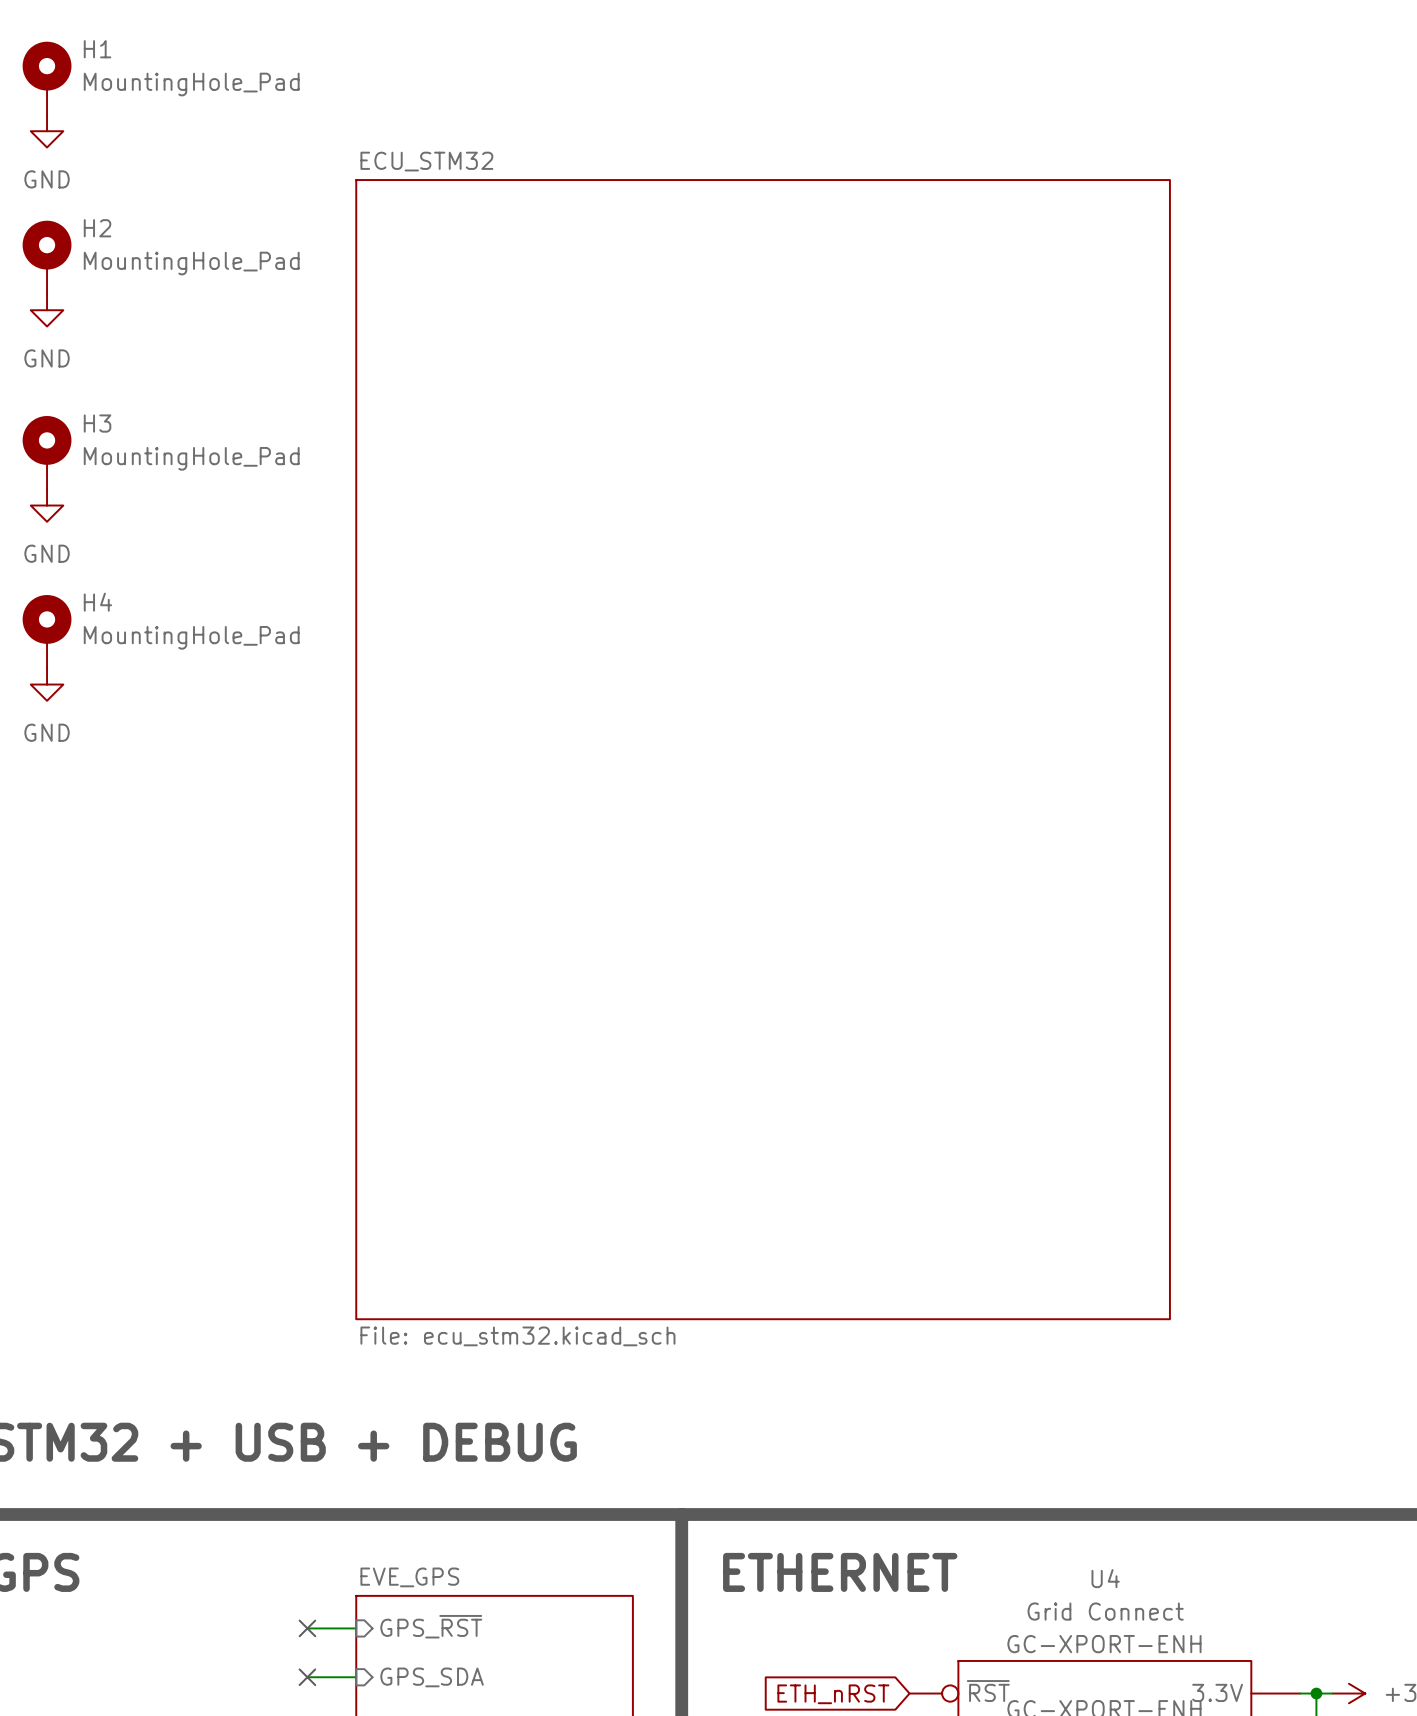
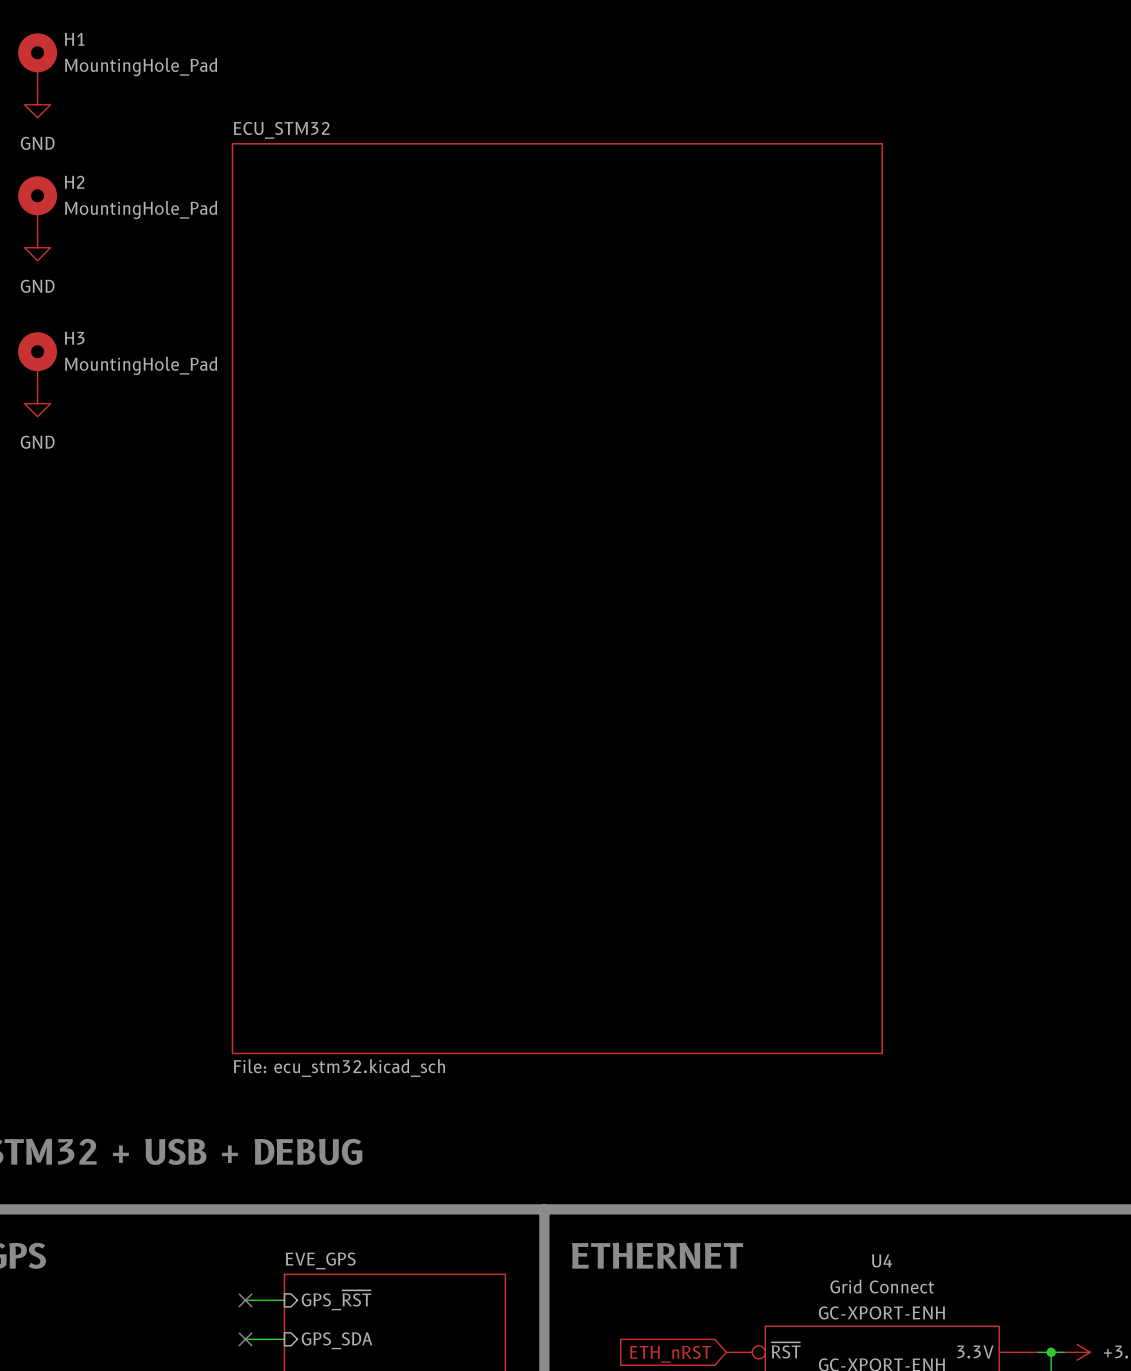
H4: MountingHole_Pad (47, 631) -> none
power symbol: GND (47, 684) -> none
sheet ECU_STM32 position: (763, 749) -> (557, 598)

